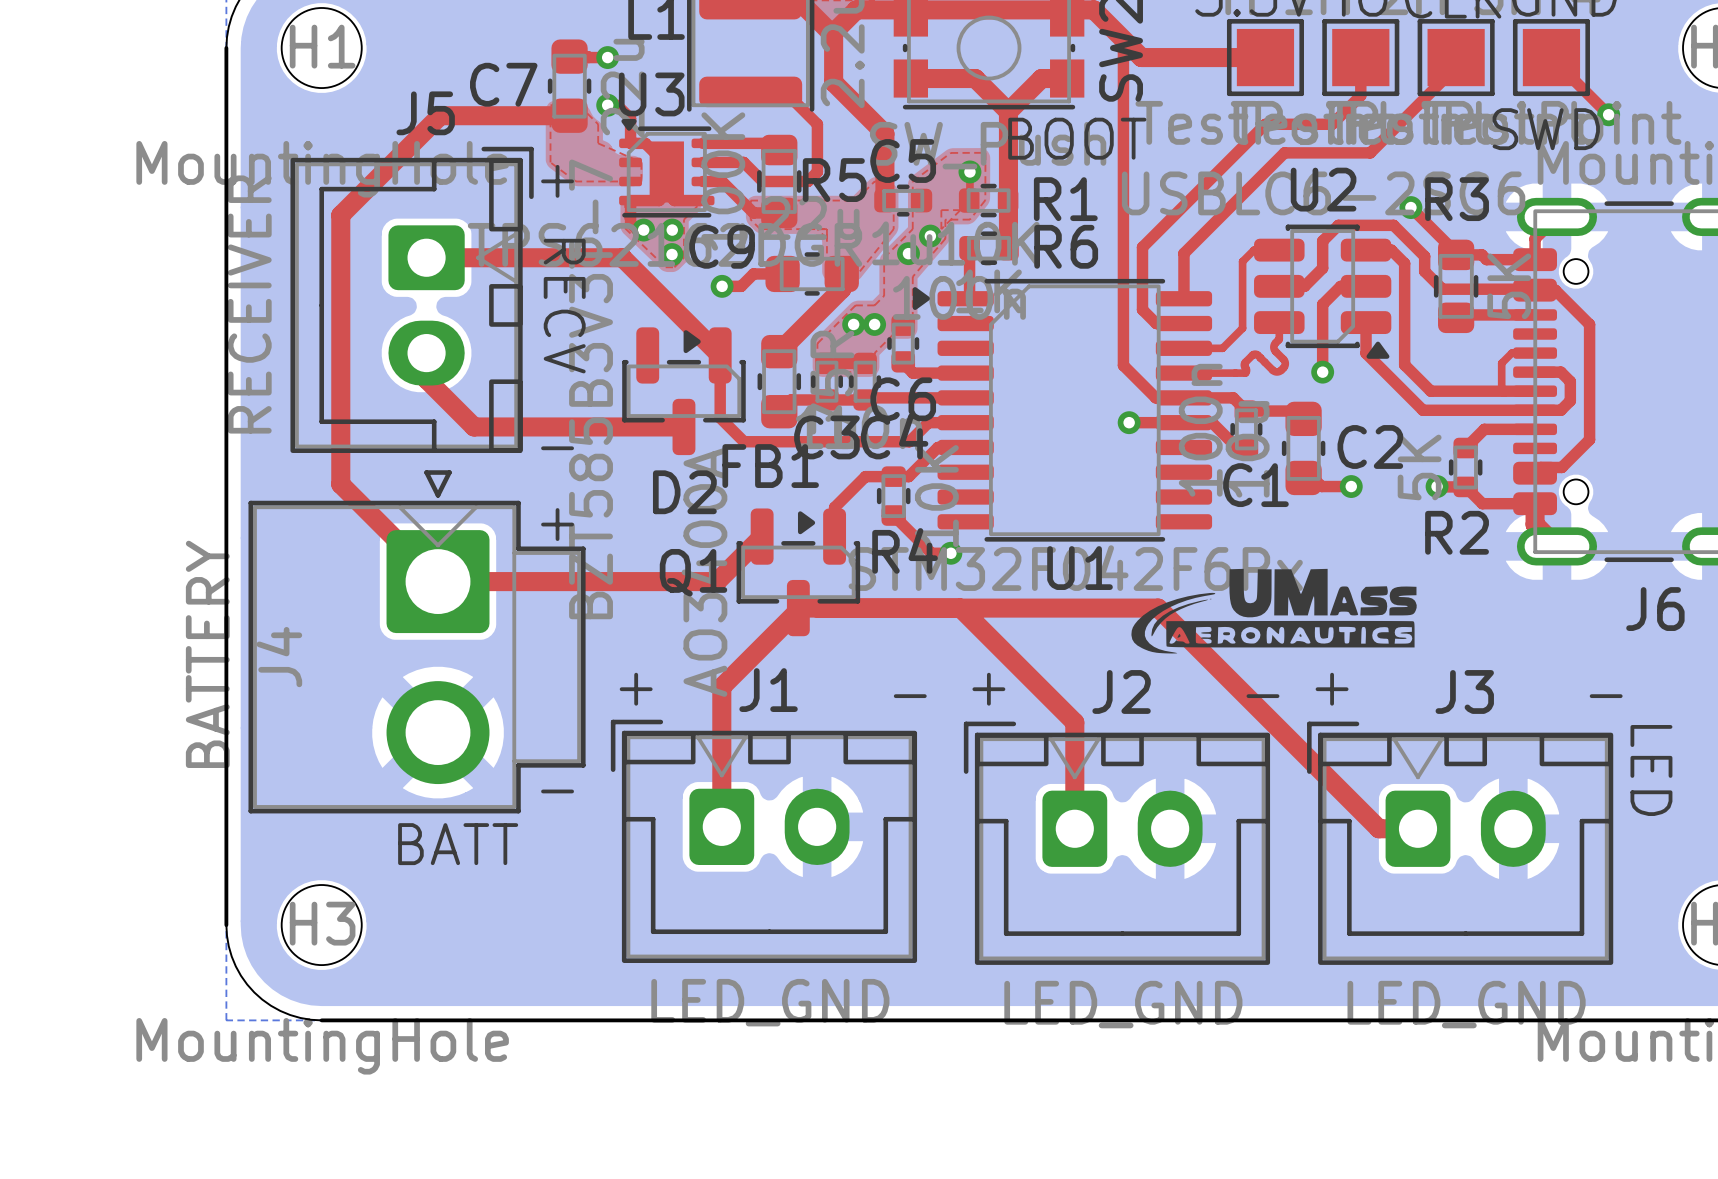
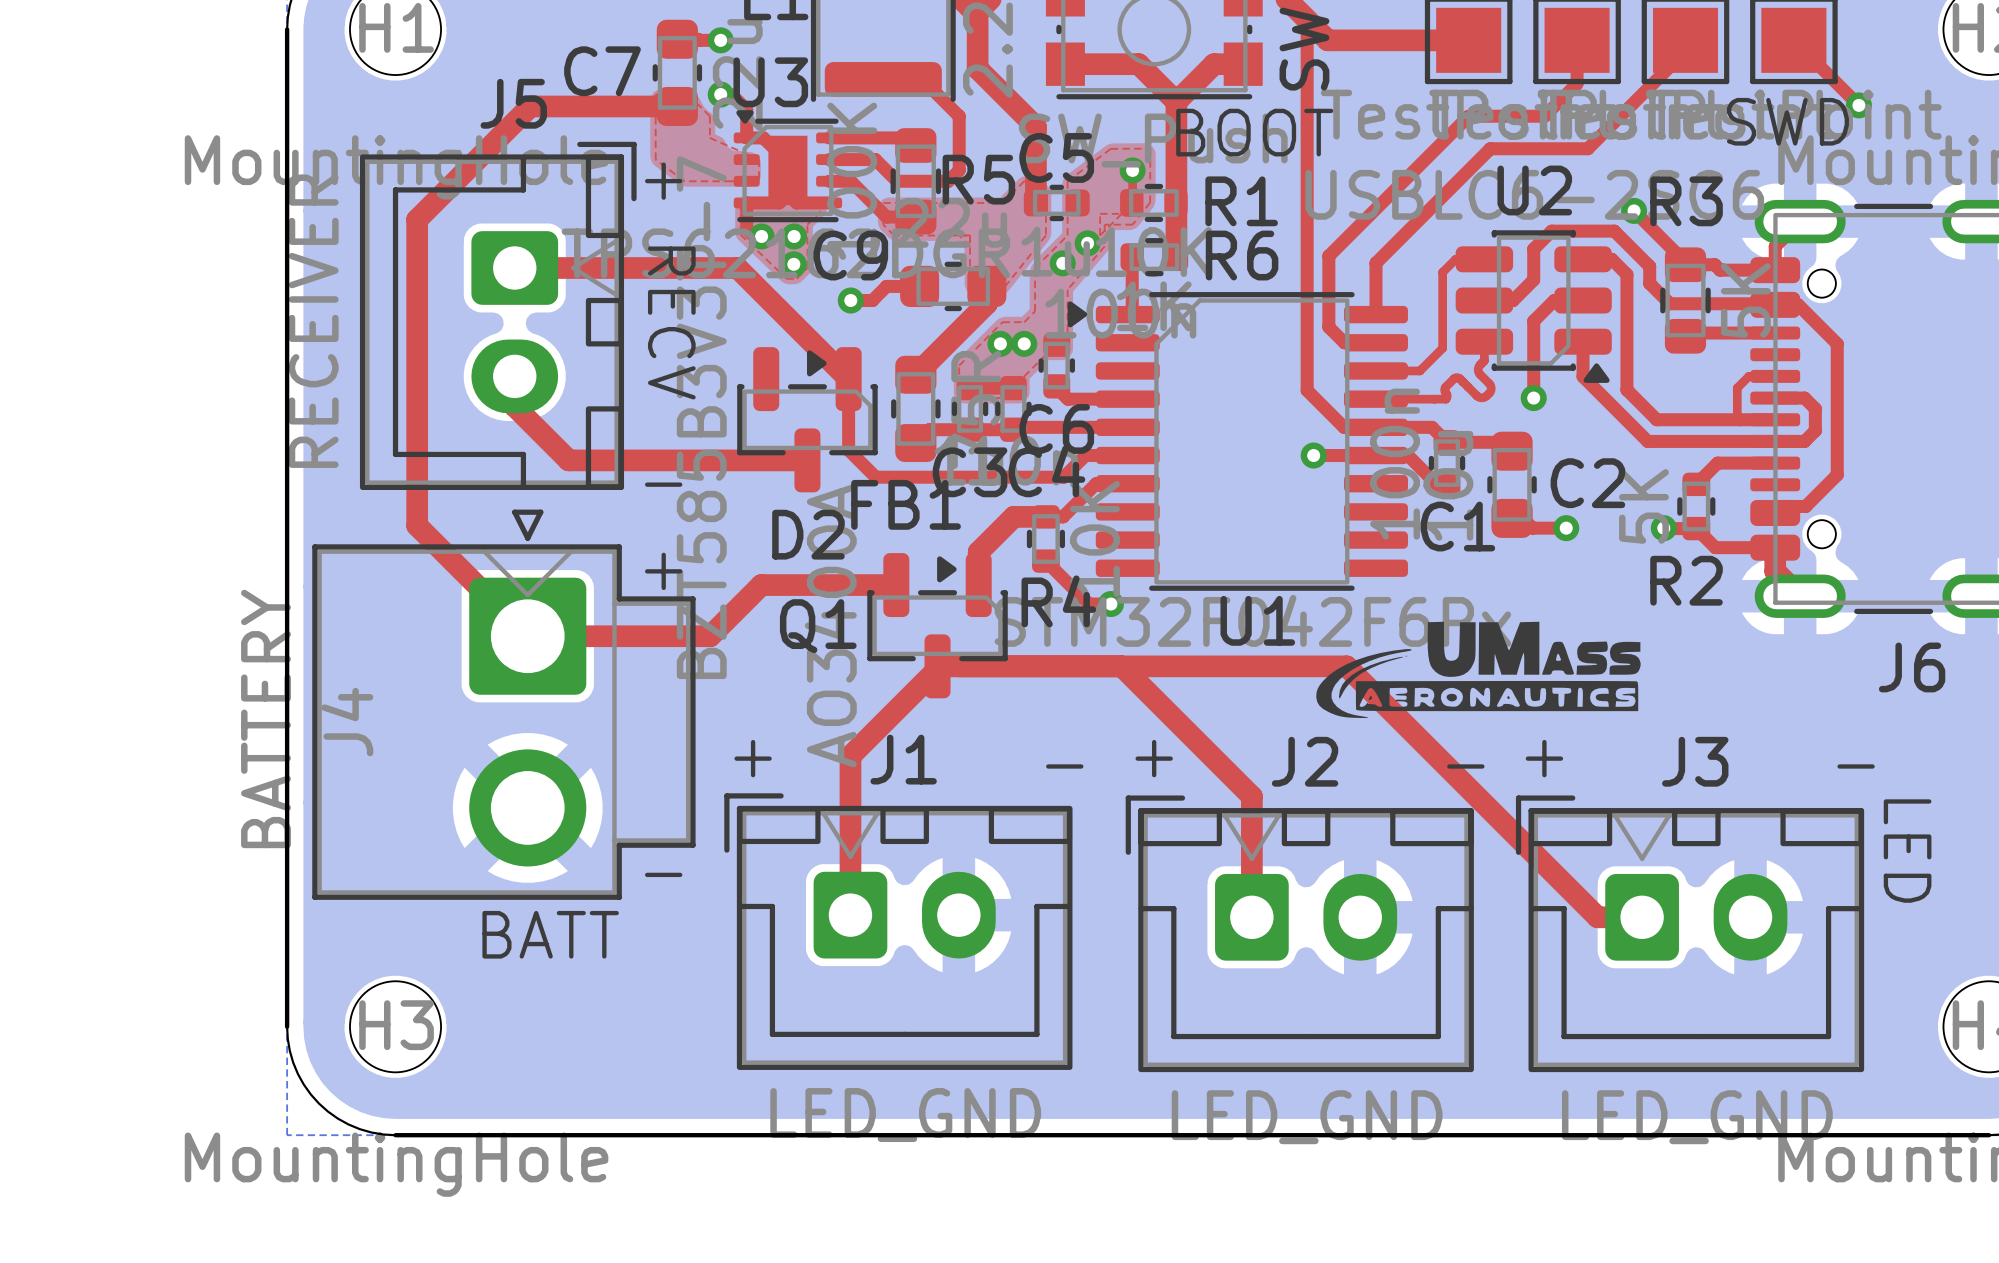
top track width: thin (893, 476) (865, 476) (834, 507) (834, 536) -> thick (1045, 516) (1013, 516) (978, 552) (978, 585)
top track: (762, 536) (717, 581) (598, 581) -> (896, 585) (761, 585) (710, 636)

